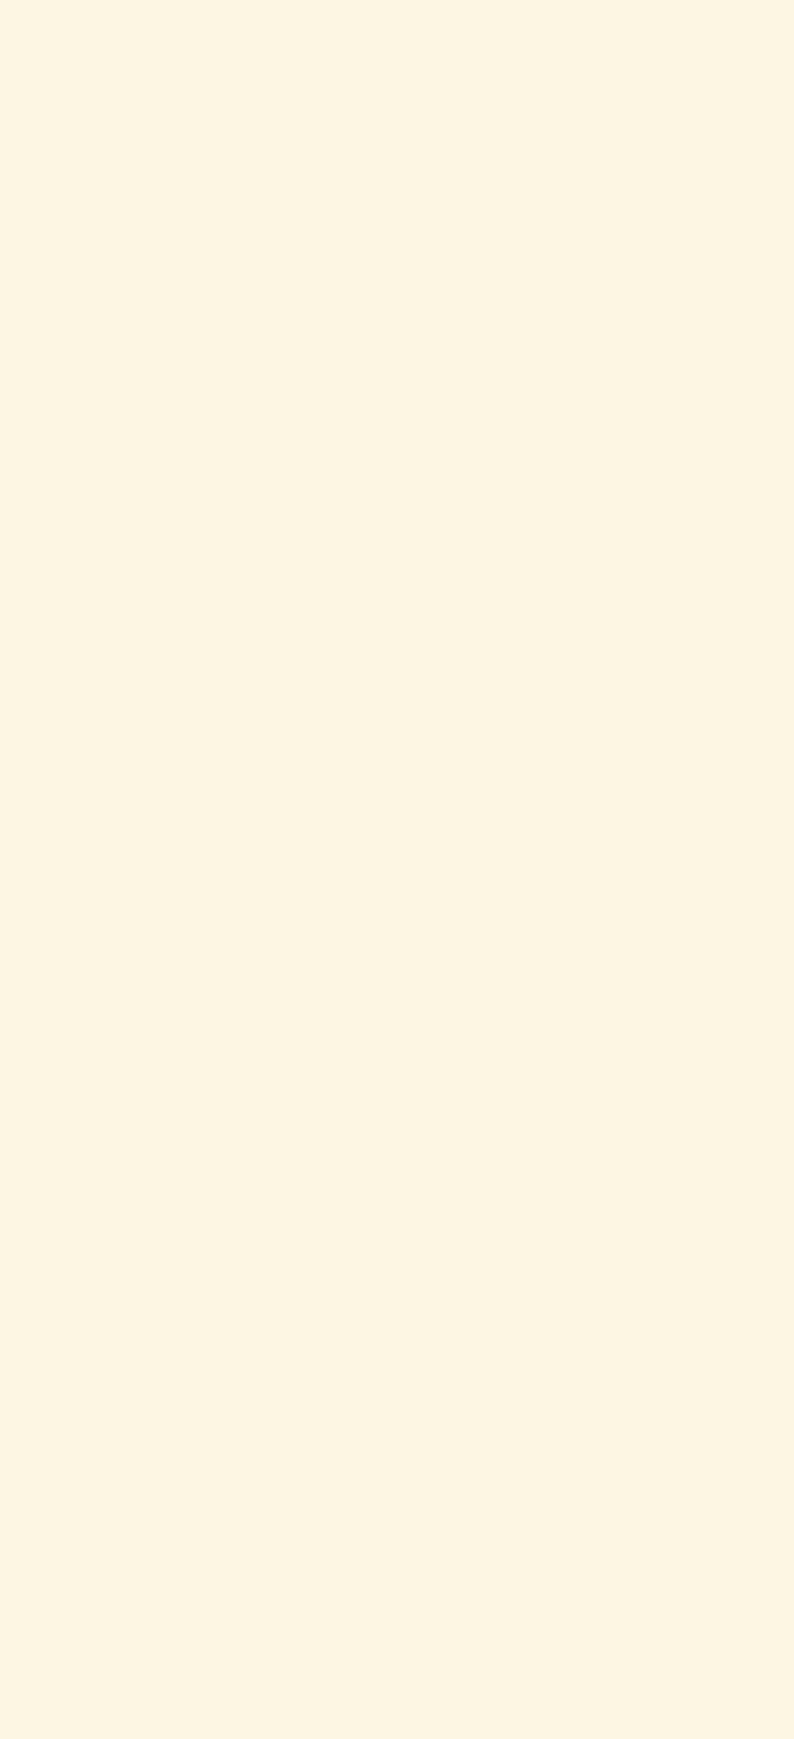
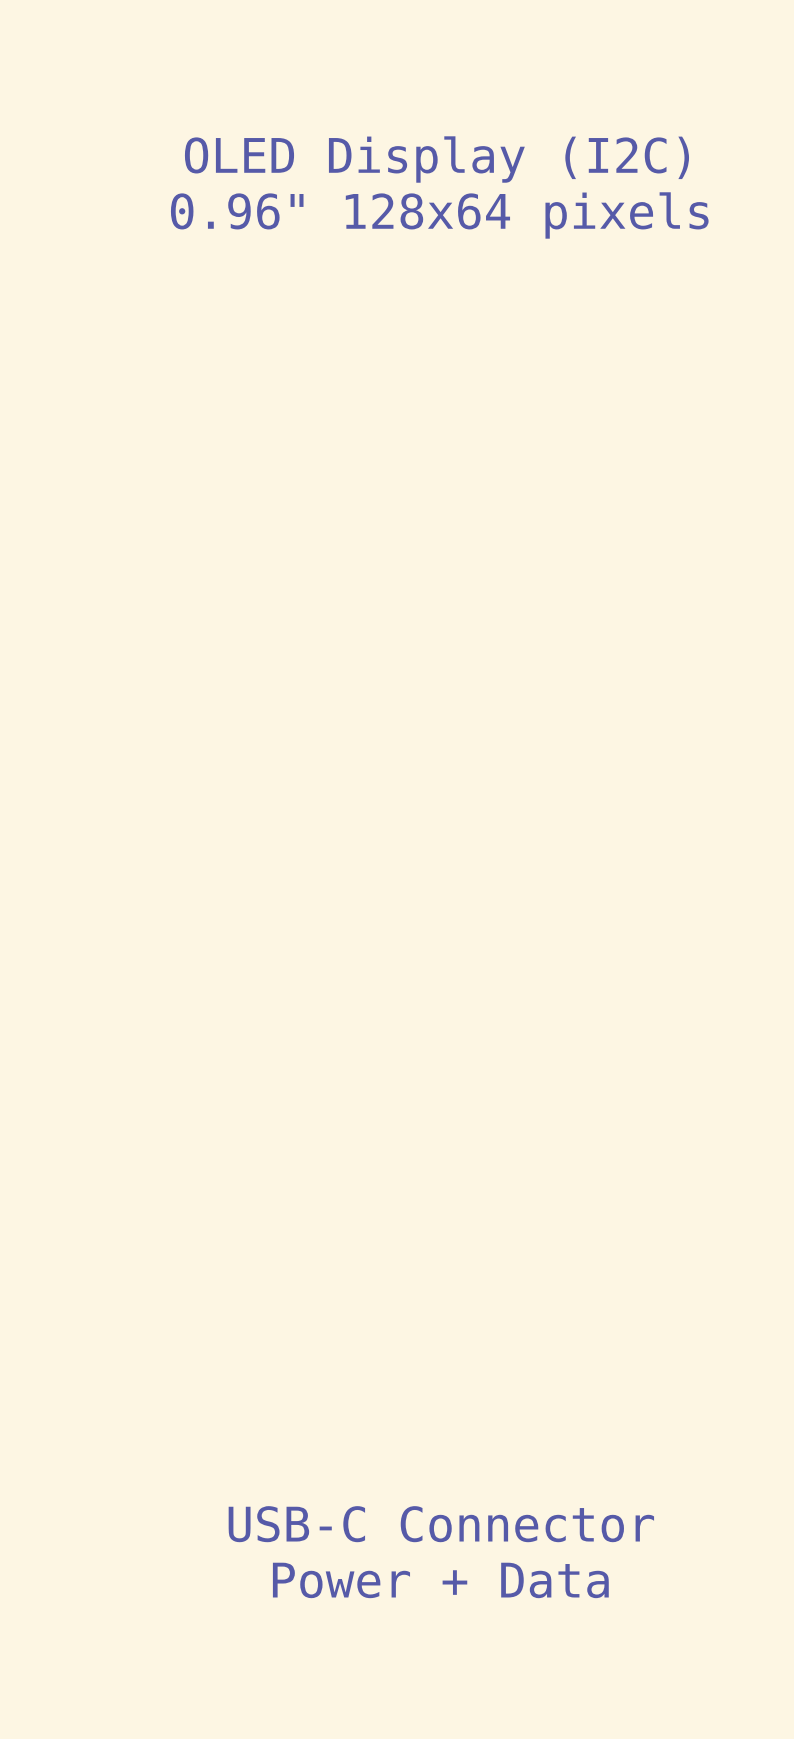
text: none -> OLED Display (I2C) (436, 159)
text: none -> 0.96" 128x64 pixels (439, 215)
text: none -> USB-C Connector (441, 1524)
text: none -> Power + Data (440, 1580)

